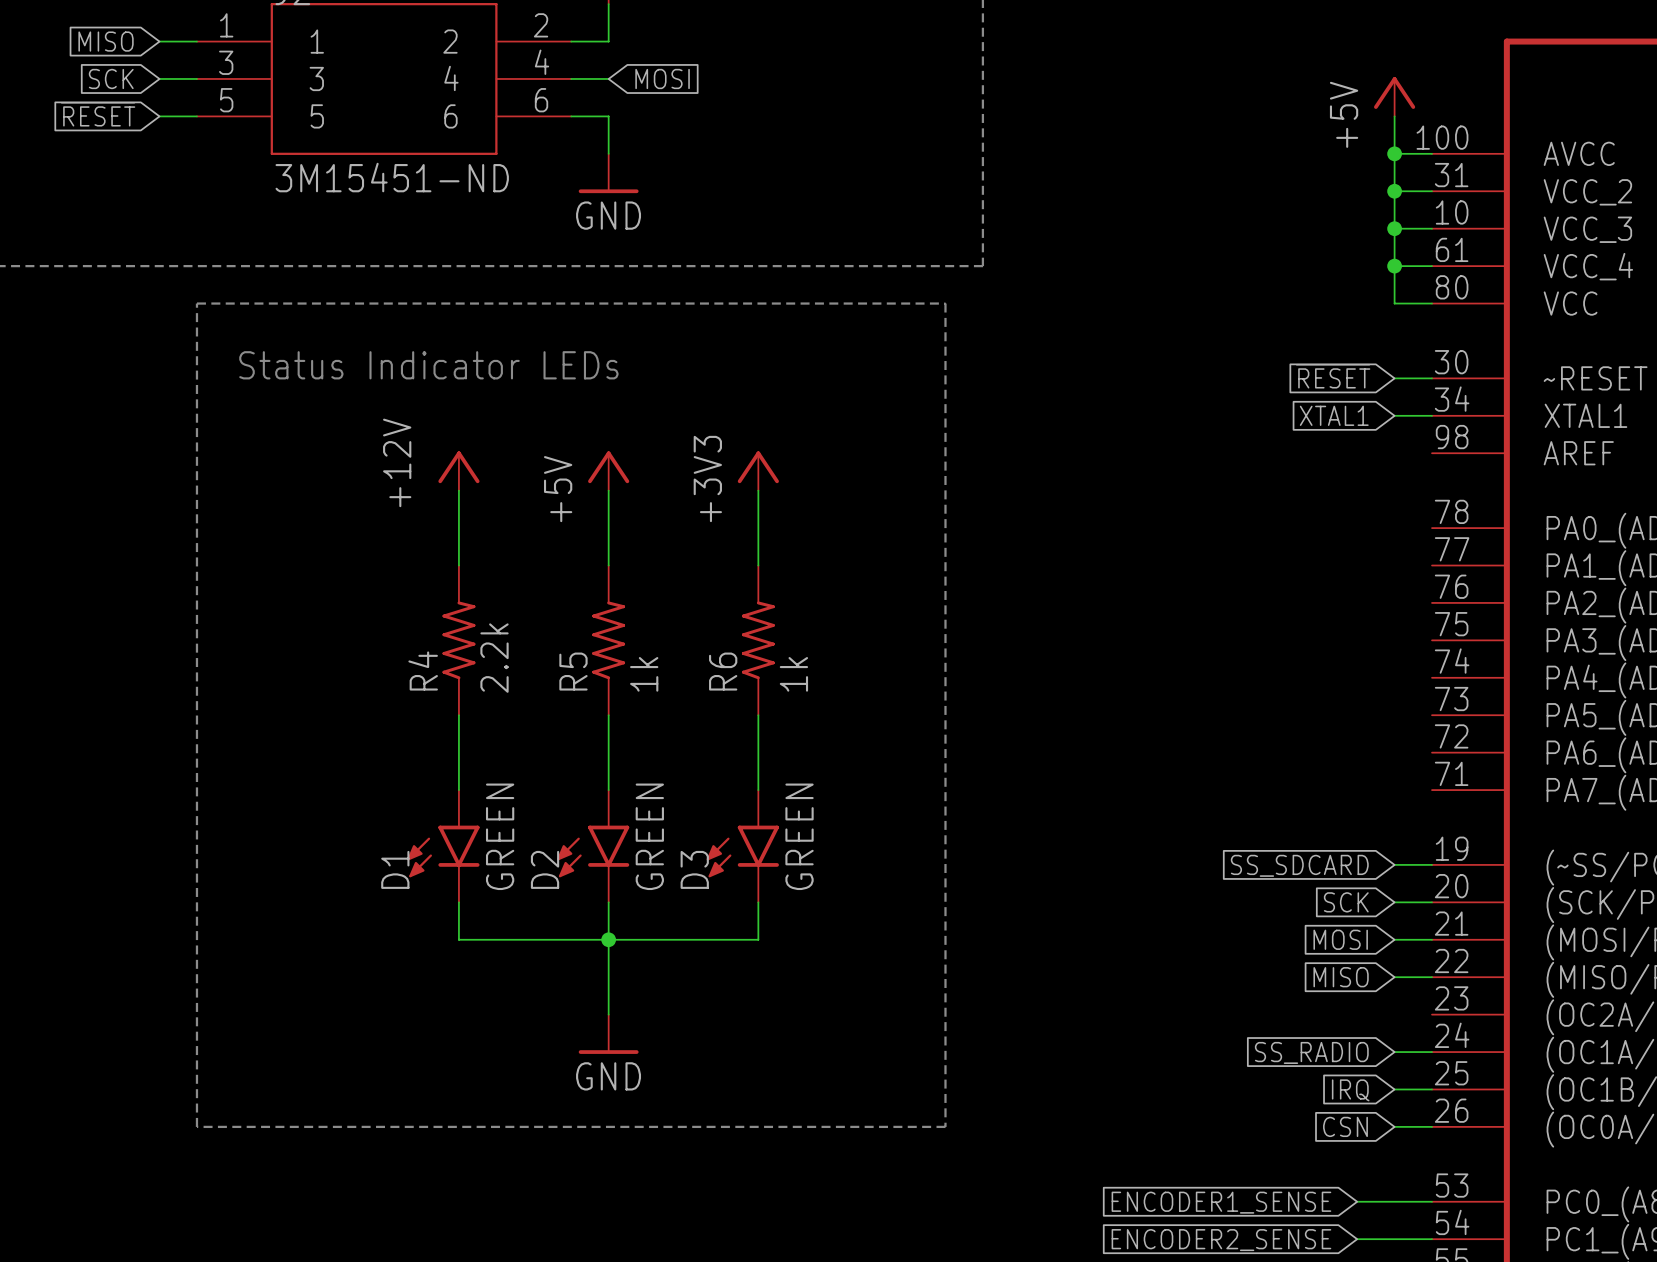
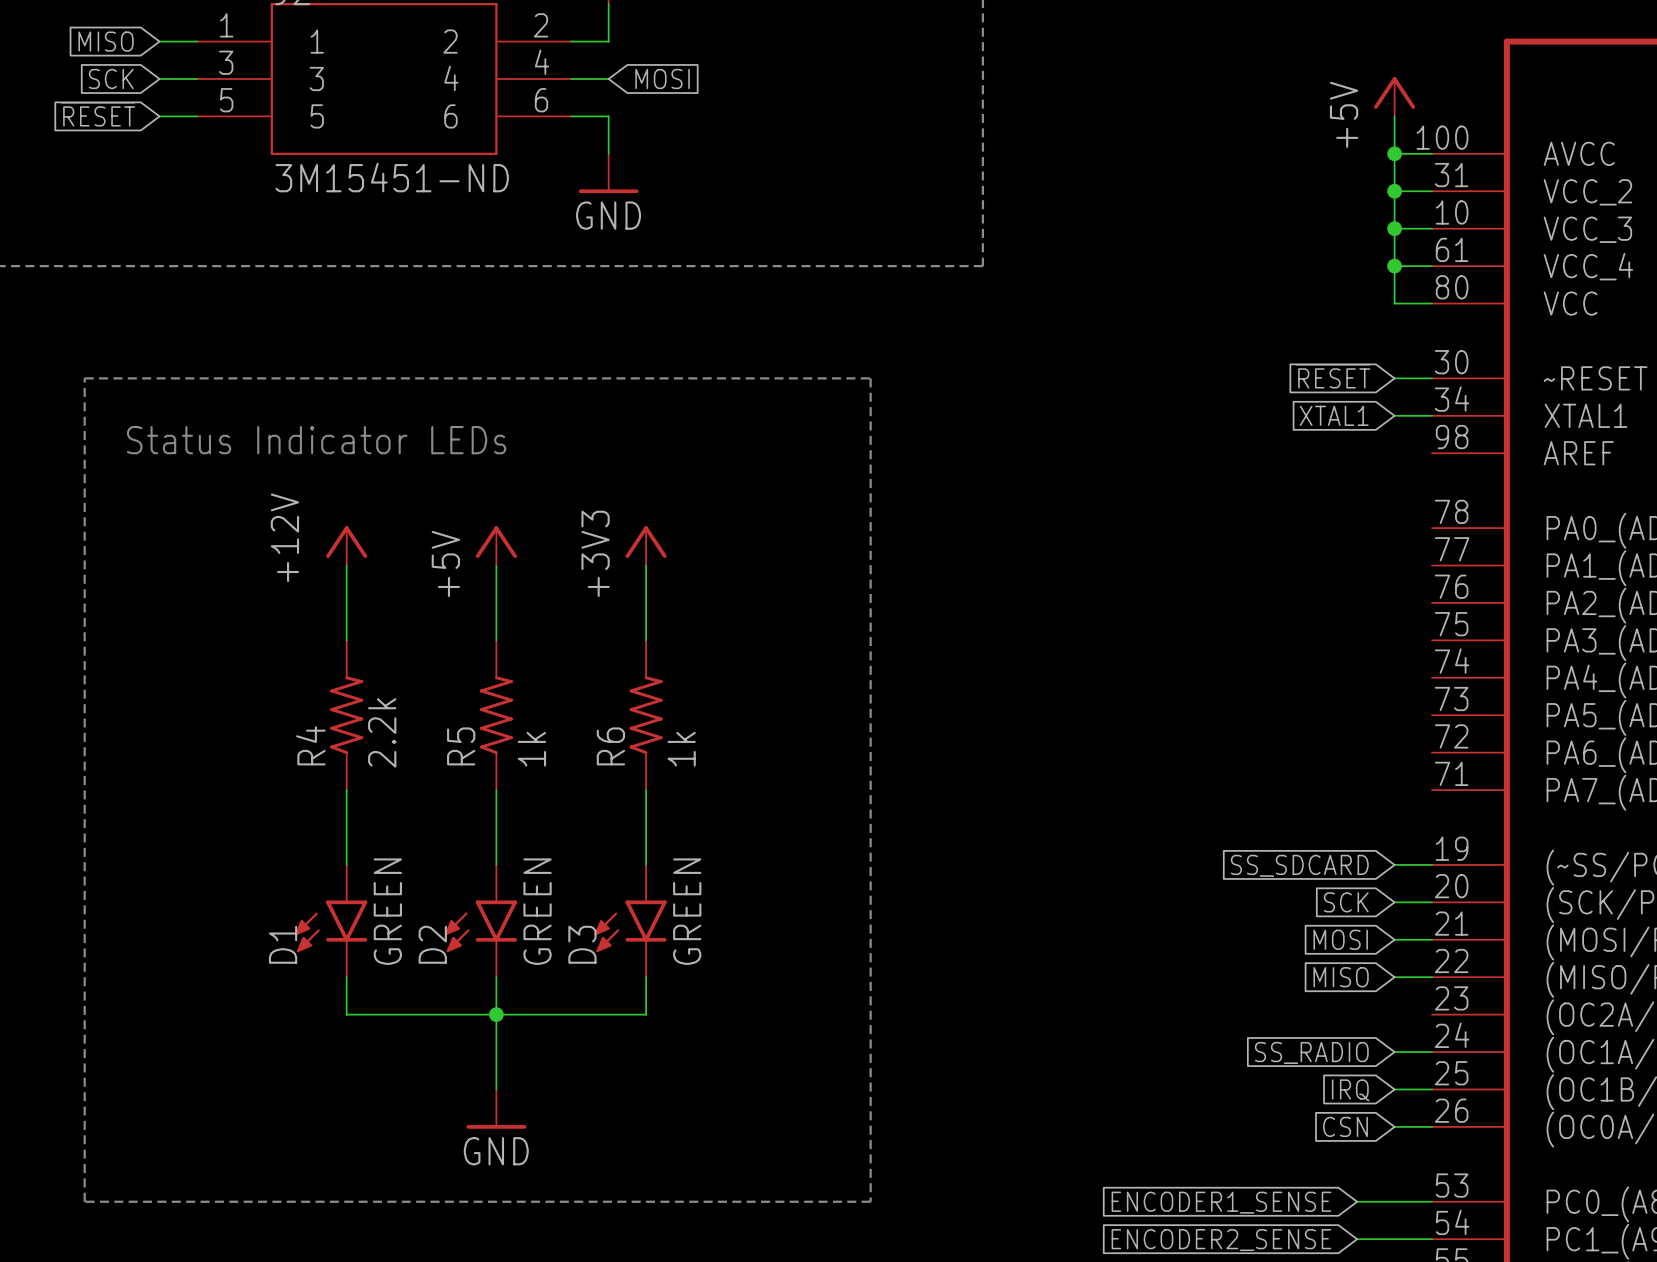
line: (196, 303) (945, 303) (945, 1126) (196, 1126) (196, 303) -> (84, 378) (84, 1201) (870, 1201) (870, 378) (84, 378)
text position: Status Indicator LEDs (428, 365) -> Status Indicator LEDs (316, 440)
power symbol position: +12V (458, 471) -> +12V (346, 545)
power symbol position: +5V (608, 471) -> +5V (496, 545)
power symbol position: +3V3 (758, 471) -> +3V3 (646, 545)
wire: (458, 490) (458, 565) -> (346, 565) (346, 640)
wire: (608, 490) (608, 565) -> (496, 565) (496, 640)
wire: (758, 490) (758, 565) -> (646, 565) (646, 640)
R4 position: (458, 640) -> (346, 715)
R5 position: (608, 640) -> (496, 715)
R6 position: (758, 640) -> (646, 715)
wire: (458, 715) (458, 790) -> (346, 790) (346, 864)
wire: (608, 715) (608, 790) -> (496, 790) (496, 864)
wire: (758, 715) (758, 790) -> (646, 790) (646, 864)
D1 position: (443, 846) -> (331, 921)
D2 position: (593, 846) -> (480, 921)
D3 position: (742, 846) -> (630, 921)
wire: (458, 902) (458, 939) (758, 939) (758, 902) -> (346, 977) (346, 1014) (646, 1014) (646, 977)
wire: (608, 902) (608, 1014) -> (496, 977) (496, 1089)
junction: (608, 939) -> none
junction: none -> (496, 1014)
power symbol position: GND (608, 1034) -> GND (496, 1109)

